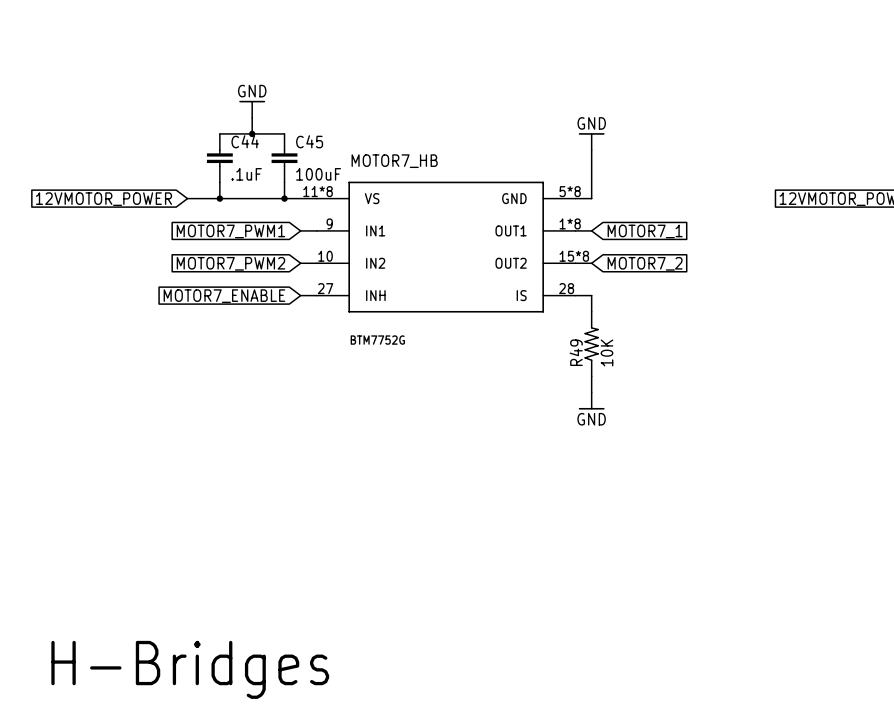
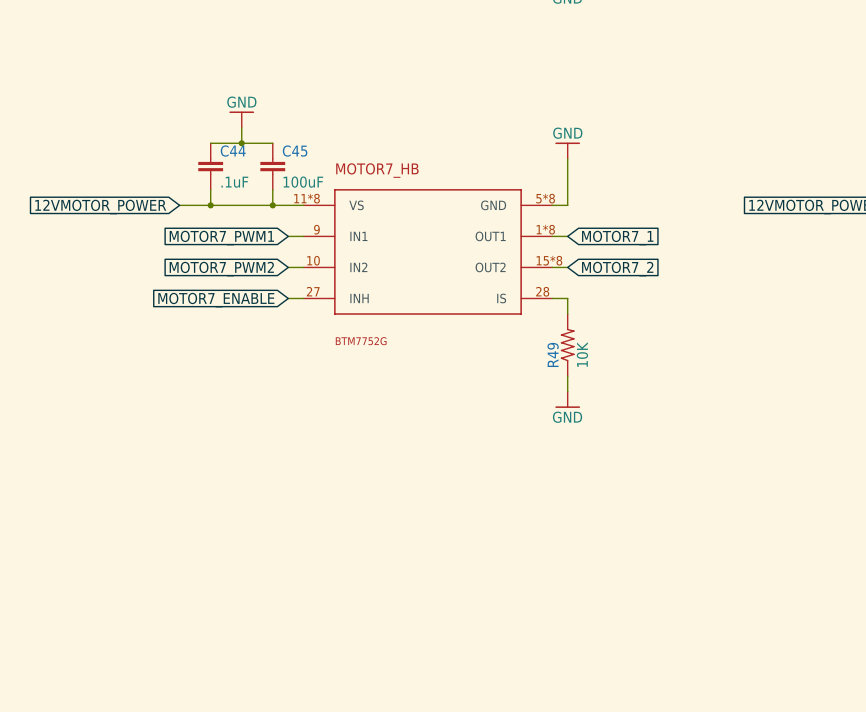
text: H-Bridges (190, 669) -> none

